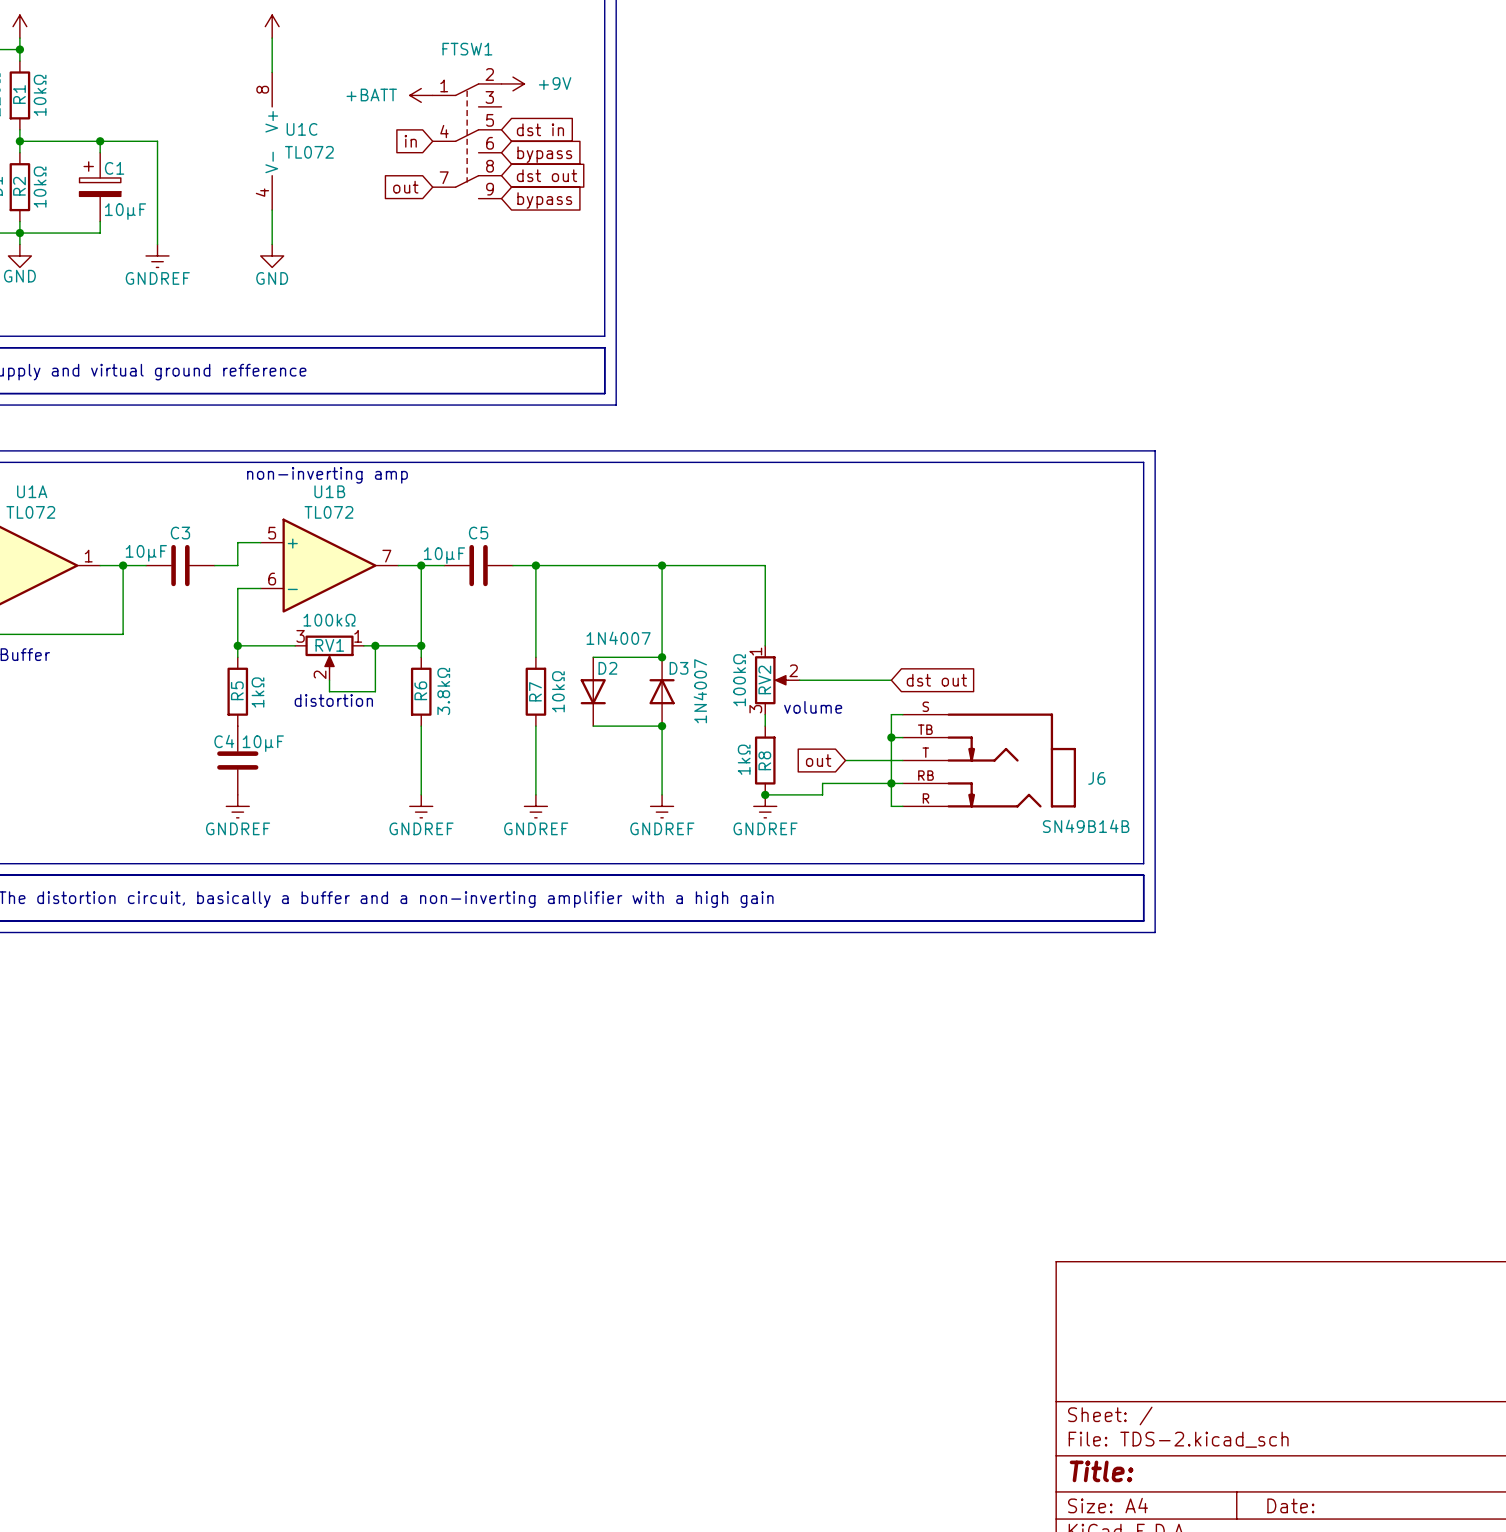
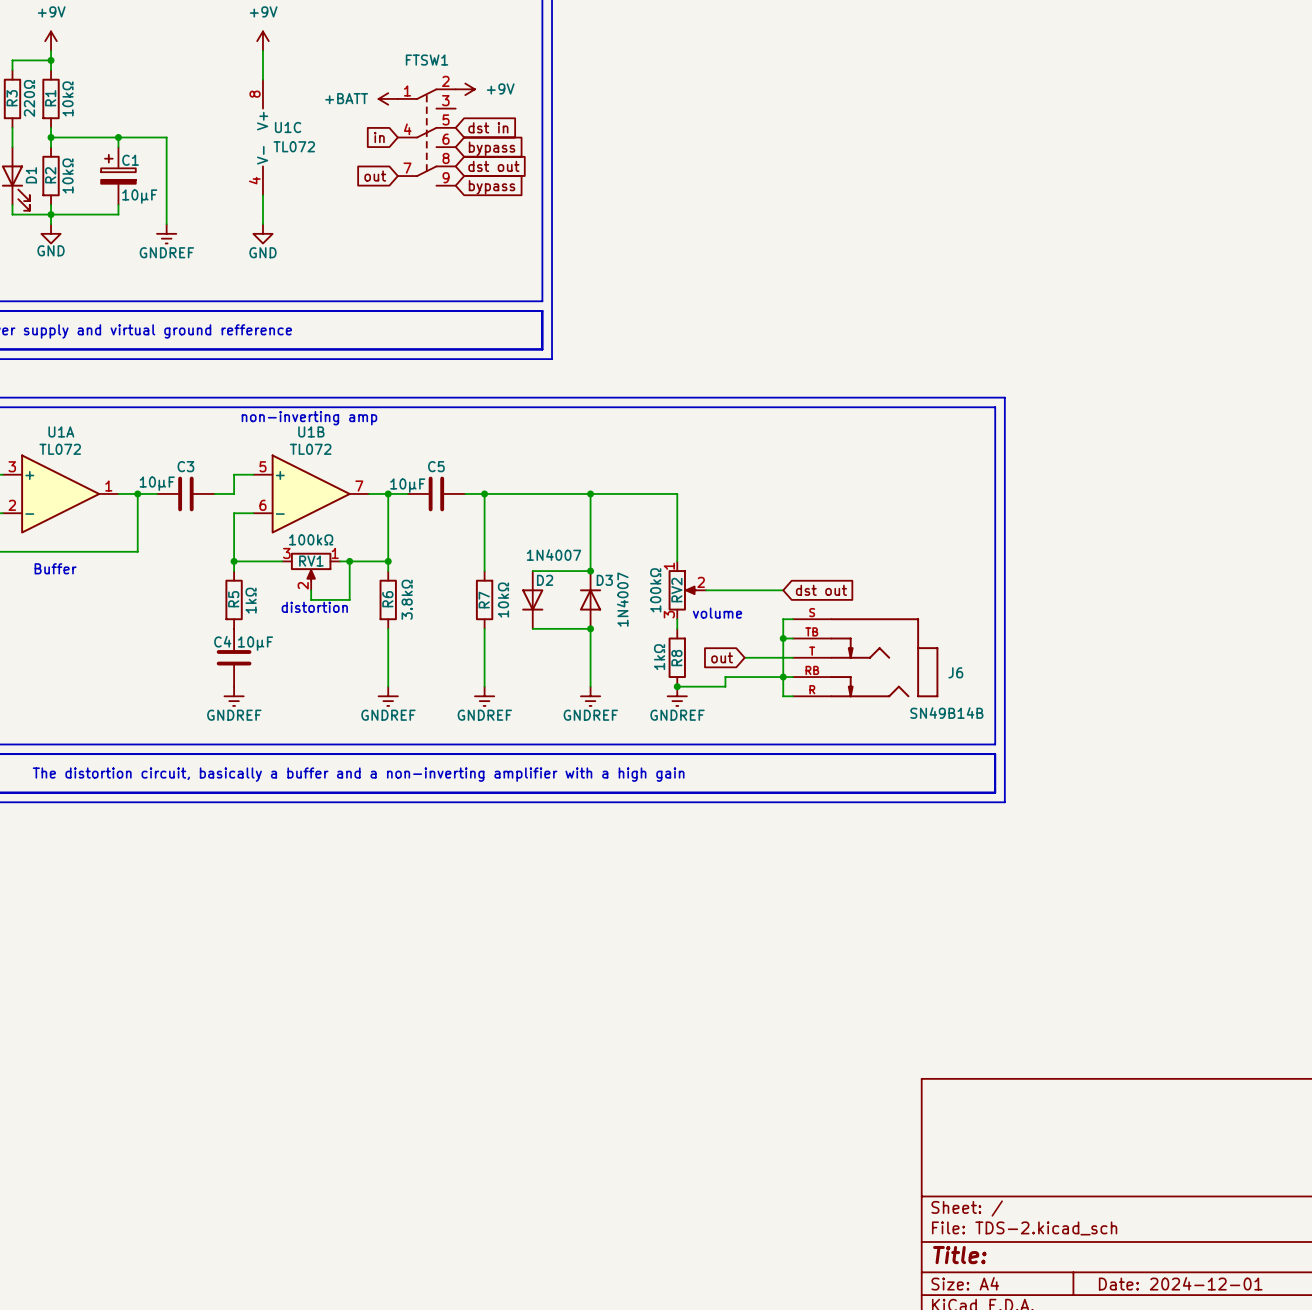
title block: Date: (1290, 1505) -> Date: 2024-12-01 (1180, 1283)

